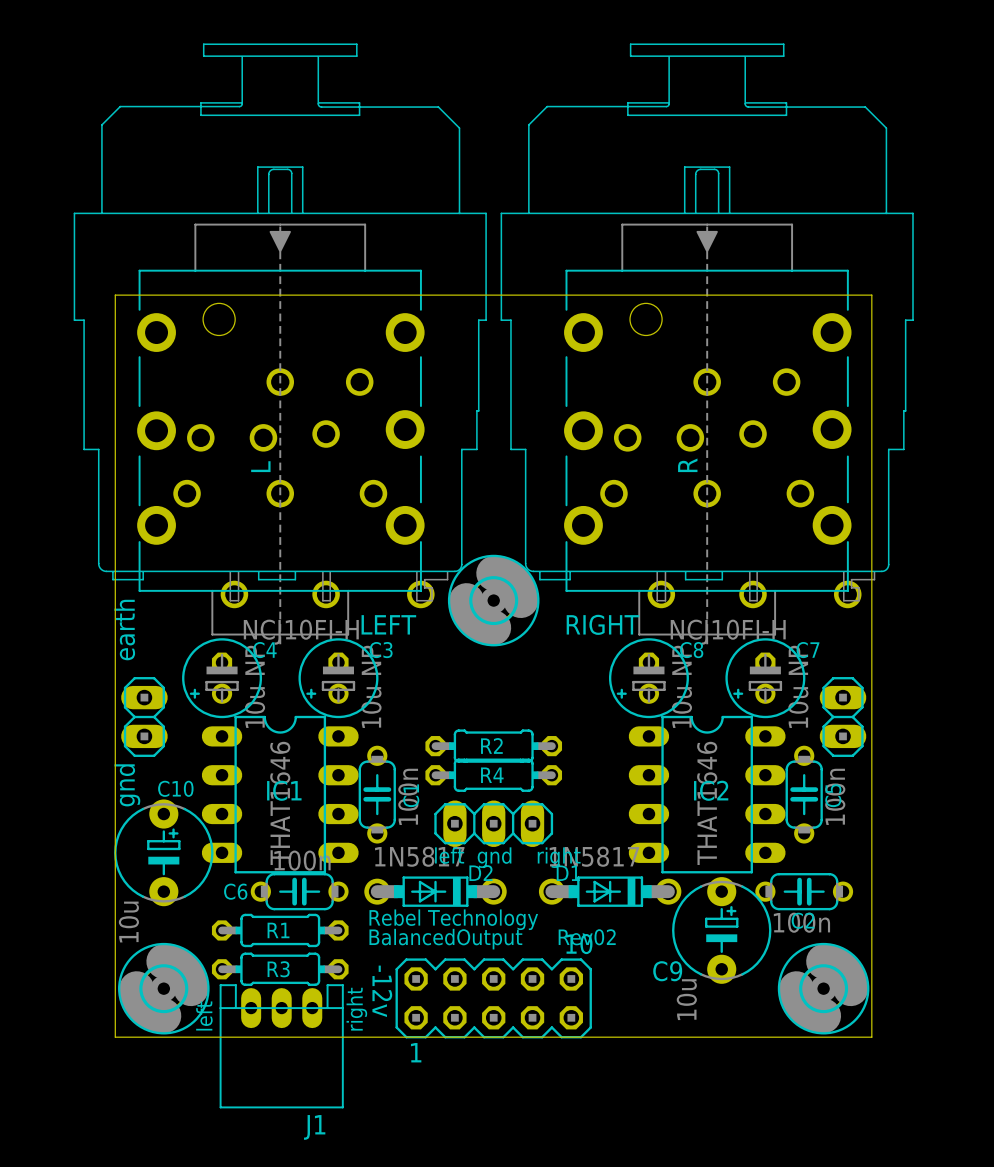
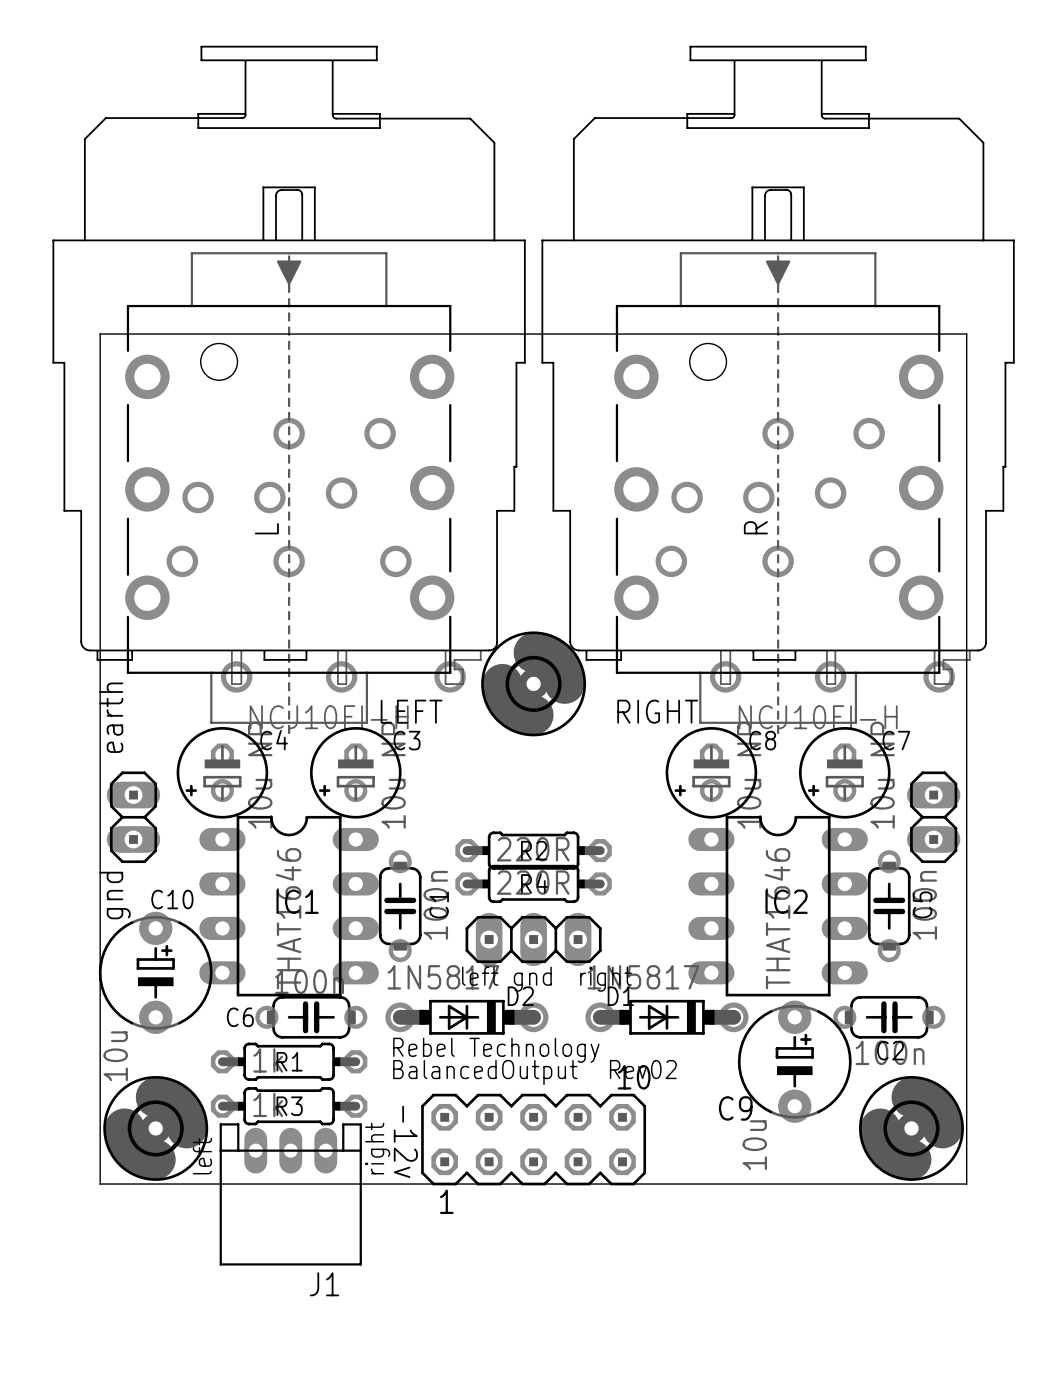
R2 value: none -> 220R (533, 849)
R4 value: none -> 220R (533, 882)
R1 value: none -> 1k (268, 1060)
R3 value: none -> 1k (268, 1104)

